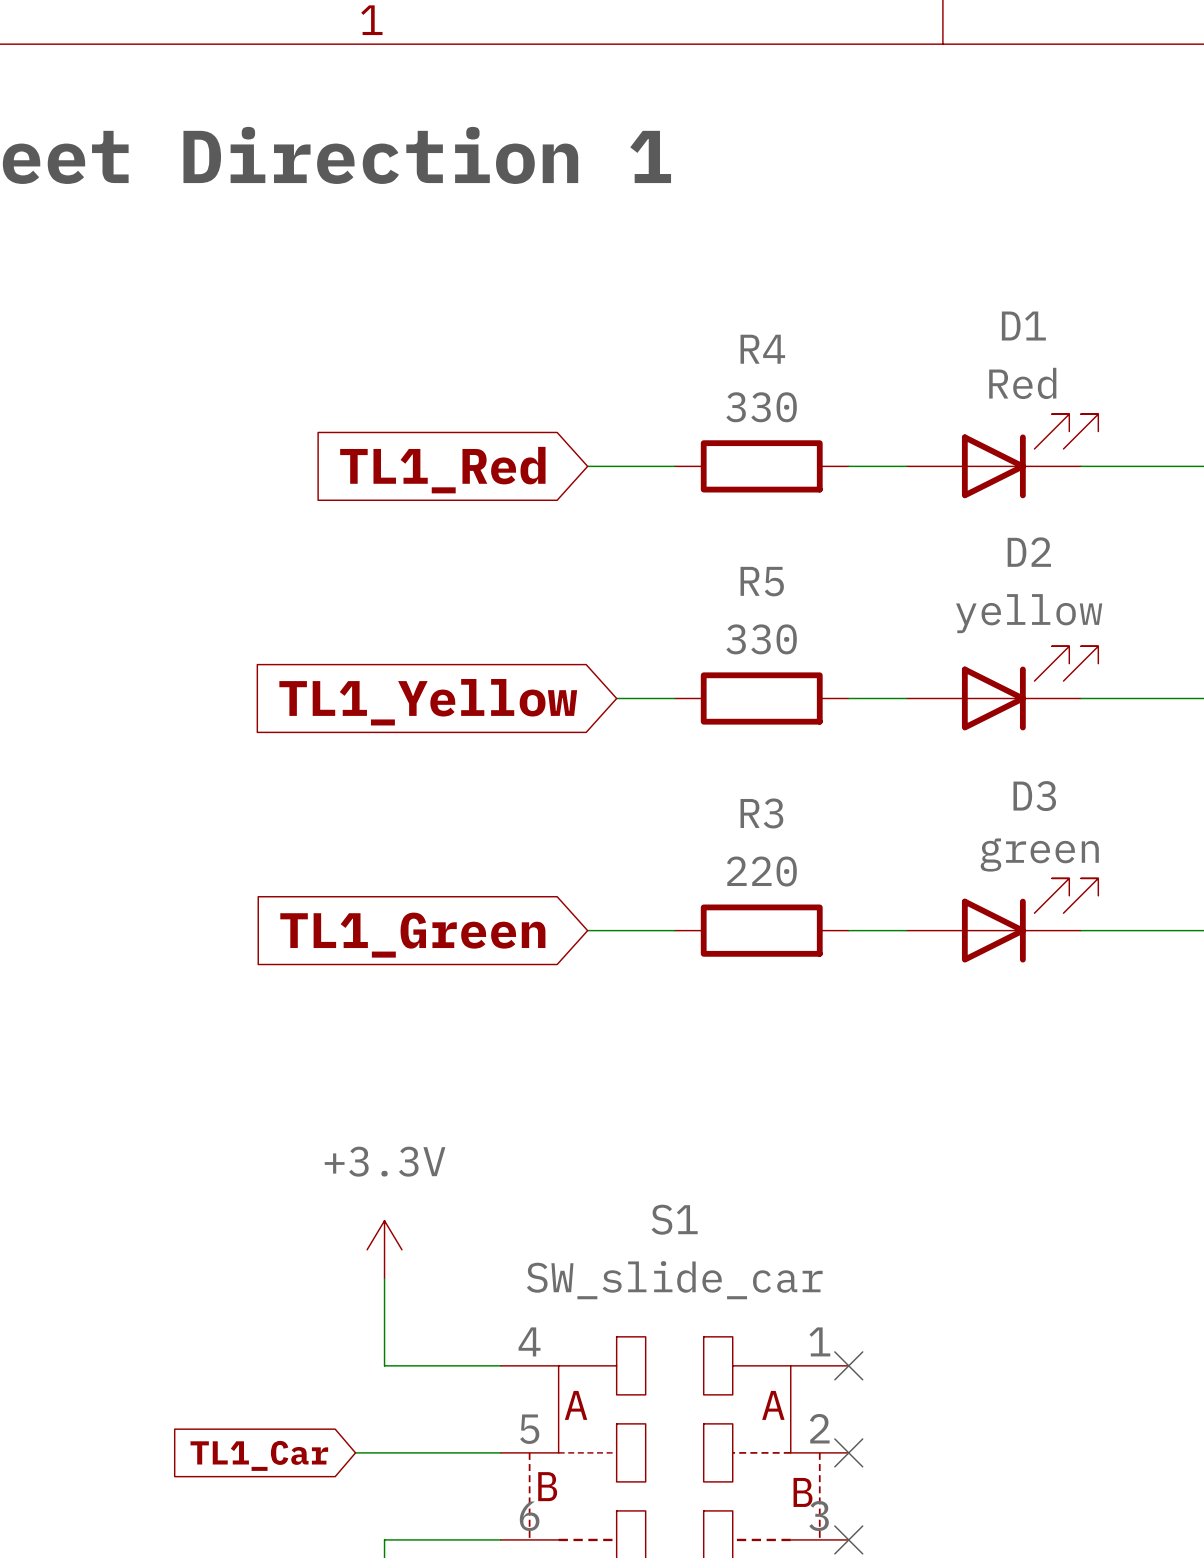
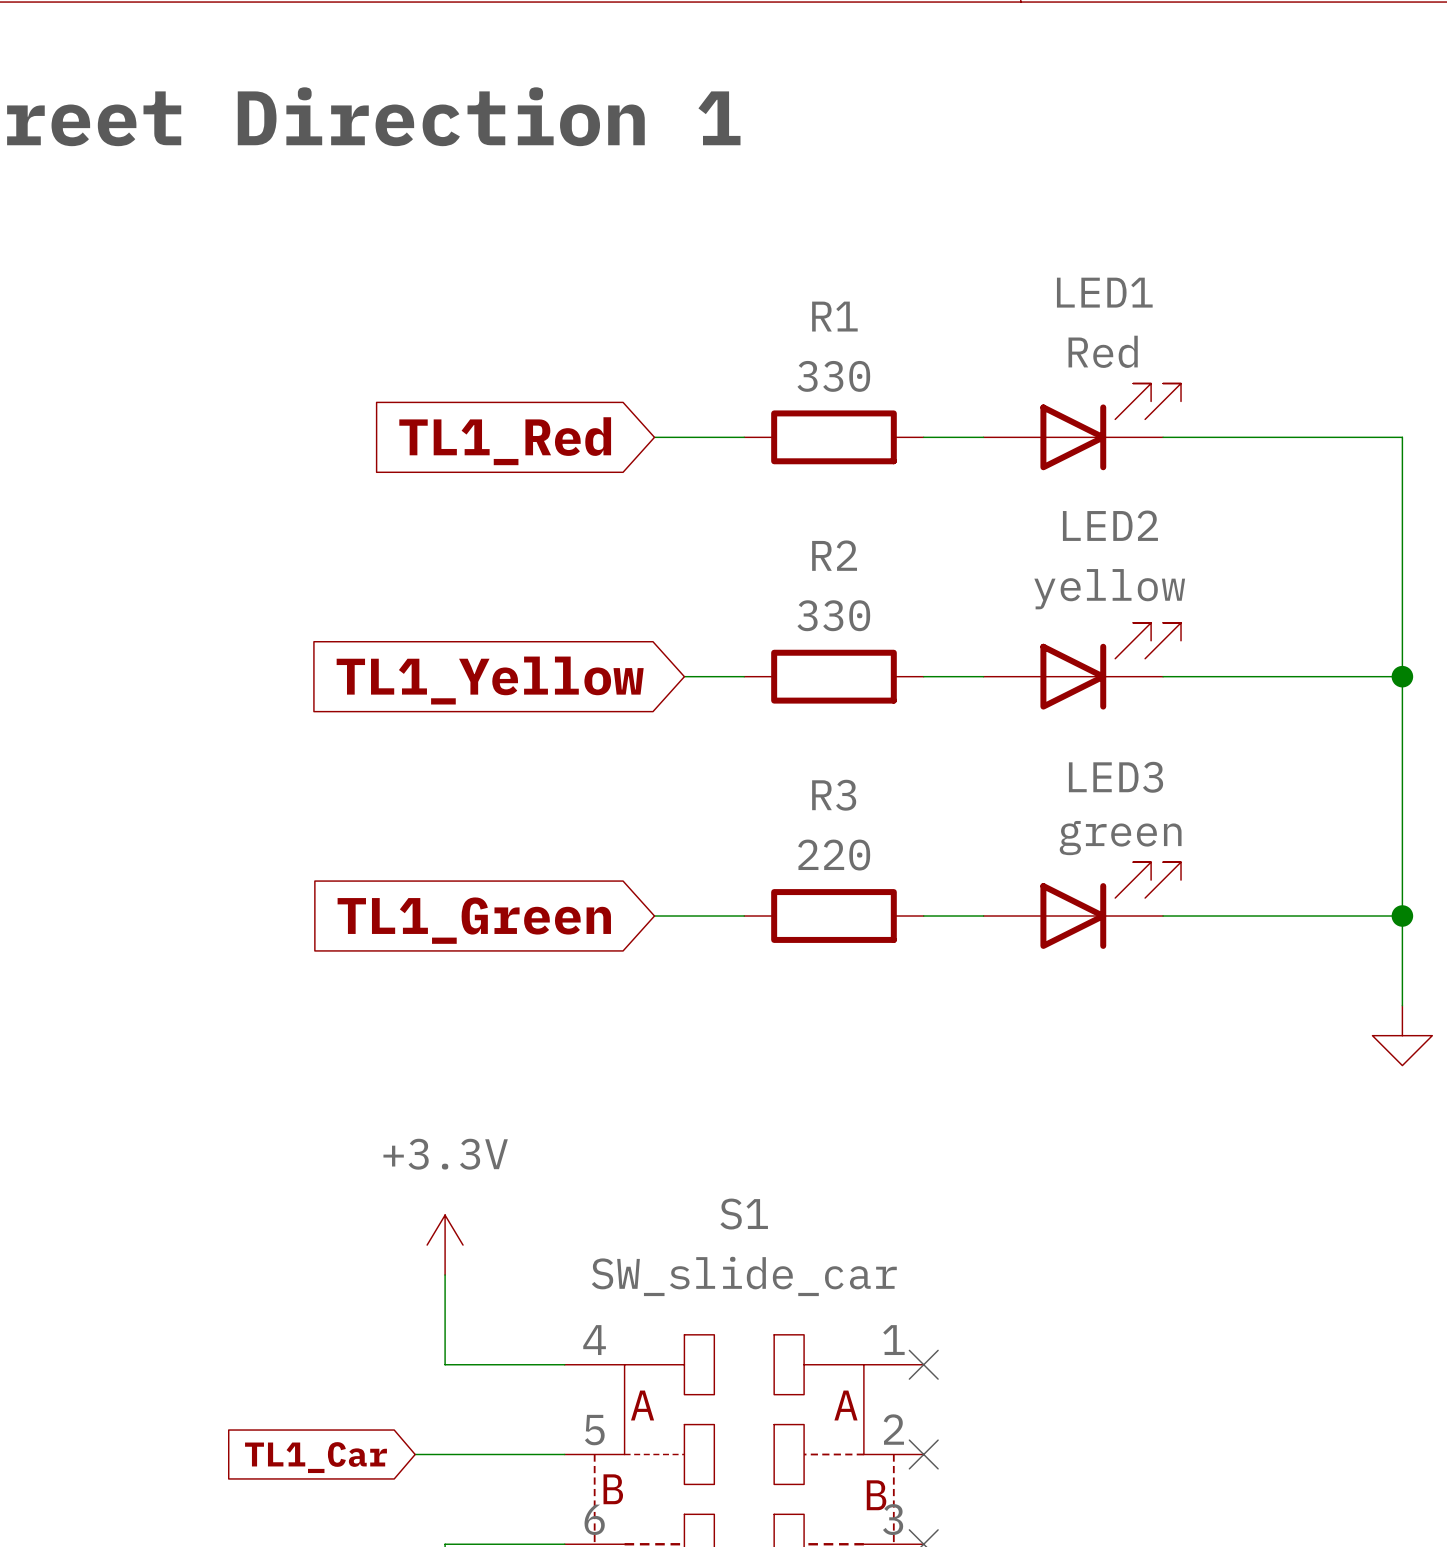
D1 name: D1 (1023, 326) -> LED1 (1104, 292)
R4 name: R4 (762, 349) -> R1 (834, 316)
D2 name: D2 (1029, 552) -> LED2 (1110, 525)
R5 name: R5 (762, 581) -> R2 (834, 555)
D3 name: D3 (1034, 796) -> LED3 (1116, 777)

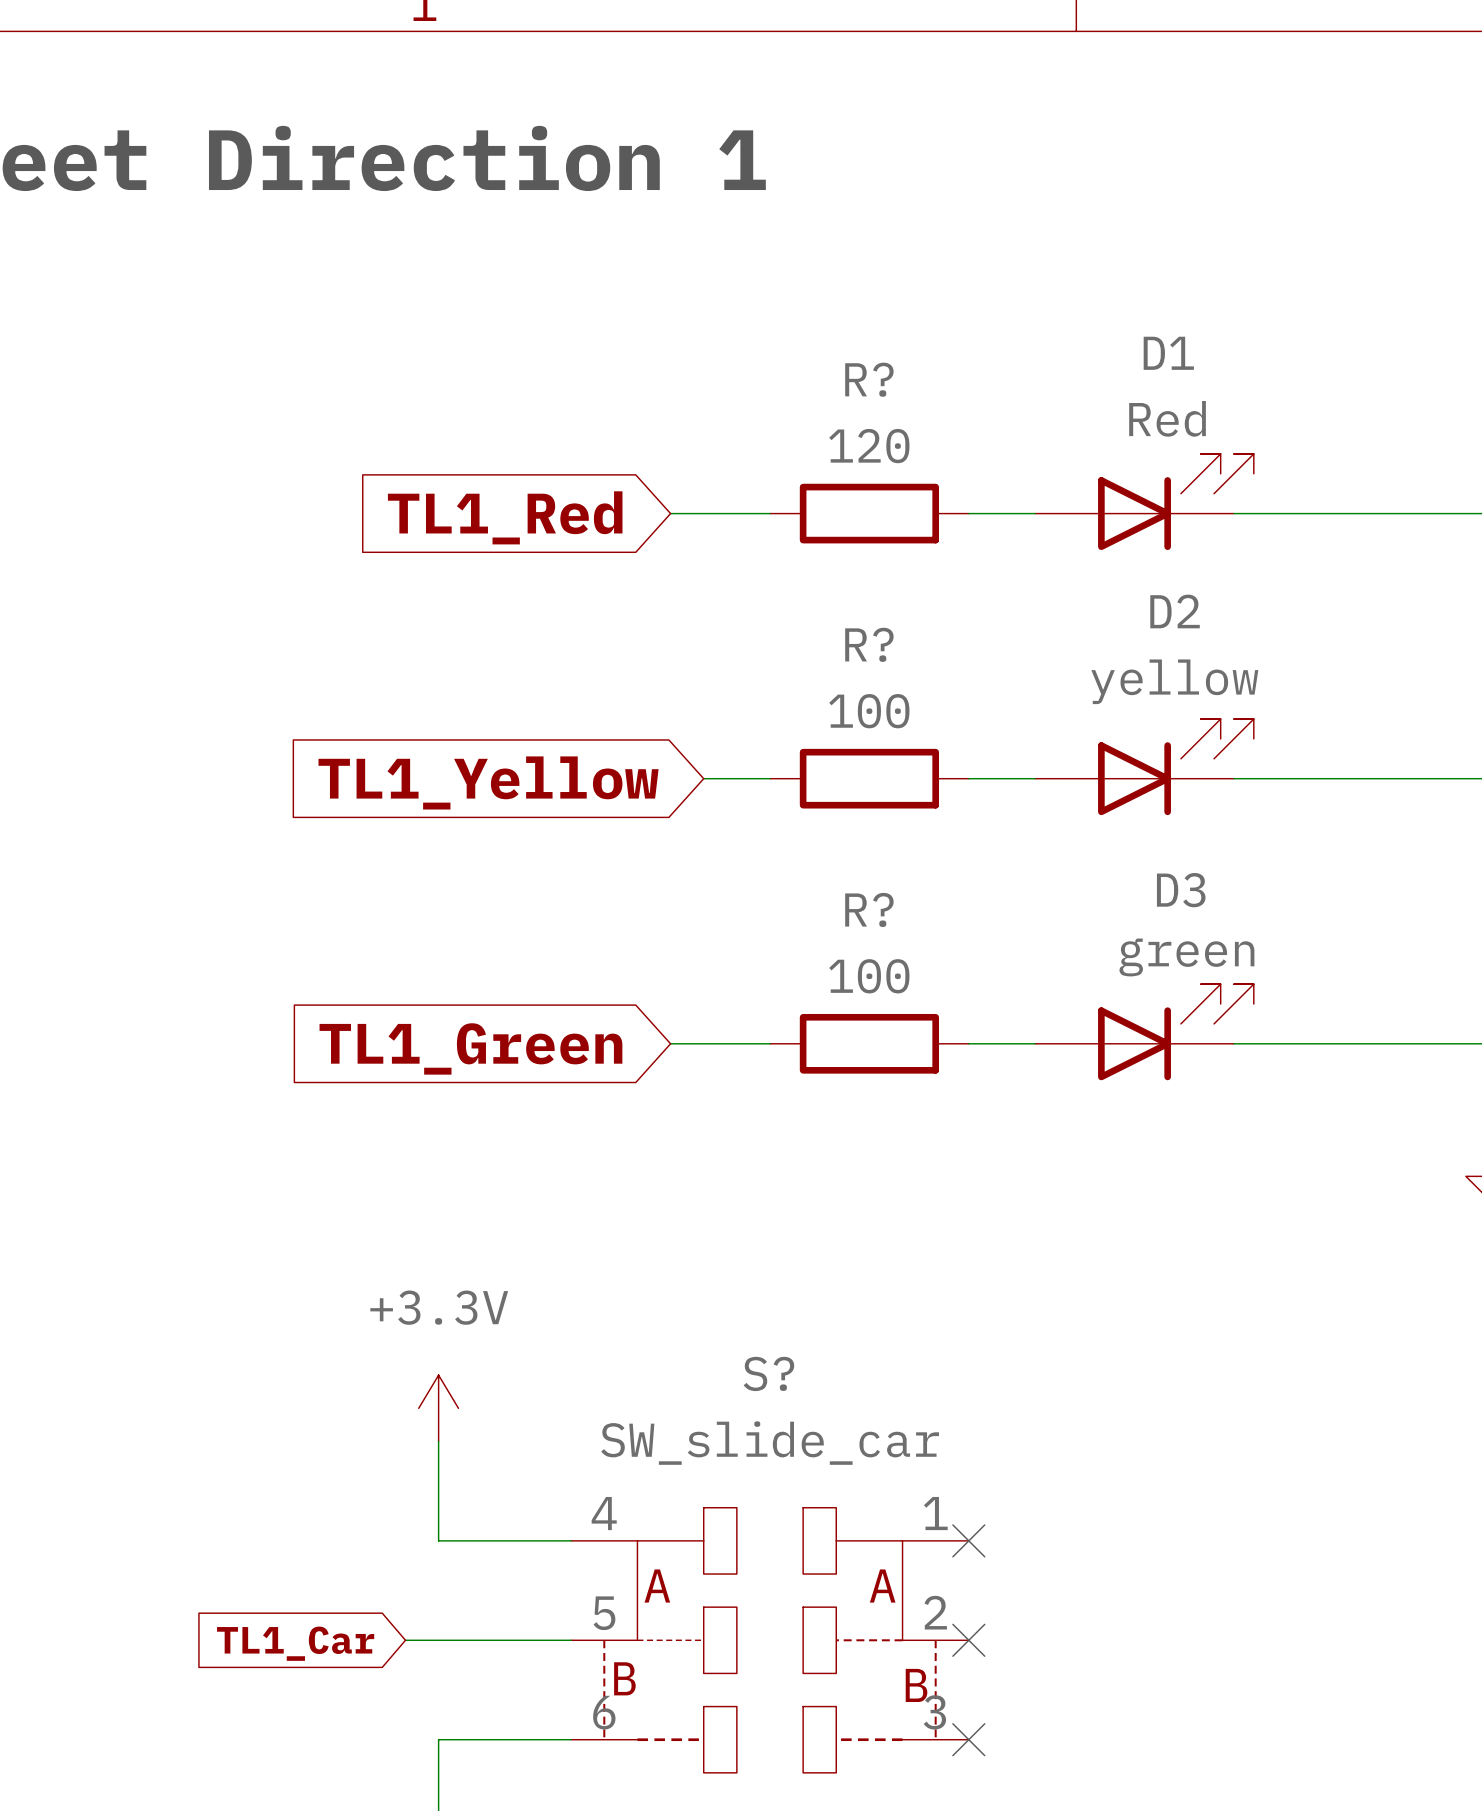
LED1 name: LED1 (1104, 292) -> D1 (1168, 353)
R1 name: R1 (834, 316) -> R? (869, 379)
R1 value: 330 (833, 376) -> 120 (869, 446)
LED2 name: LED2 (1110, 525) -> D2 (1175, 611)
R2 name: R2 (834, 555) -> R? (869, 644)
R2 value: 330 (833, 615) -> 100 (869, 711)
LED3 name: LED3 (1116, 777) -> D3 (1181, 890)
R3 name: R3 (834, 795) -> R? (869, 909)
R3 value: 220 (834, 855) -> 100 (869, 976)
S1 name: S1 (744, 1214) -> S? (768, 1373)

